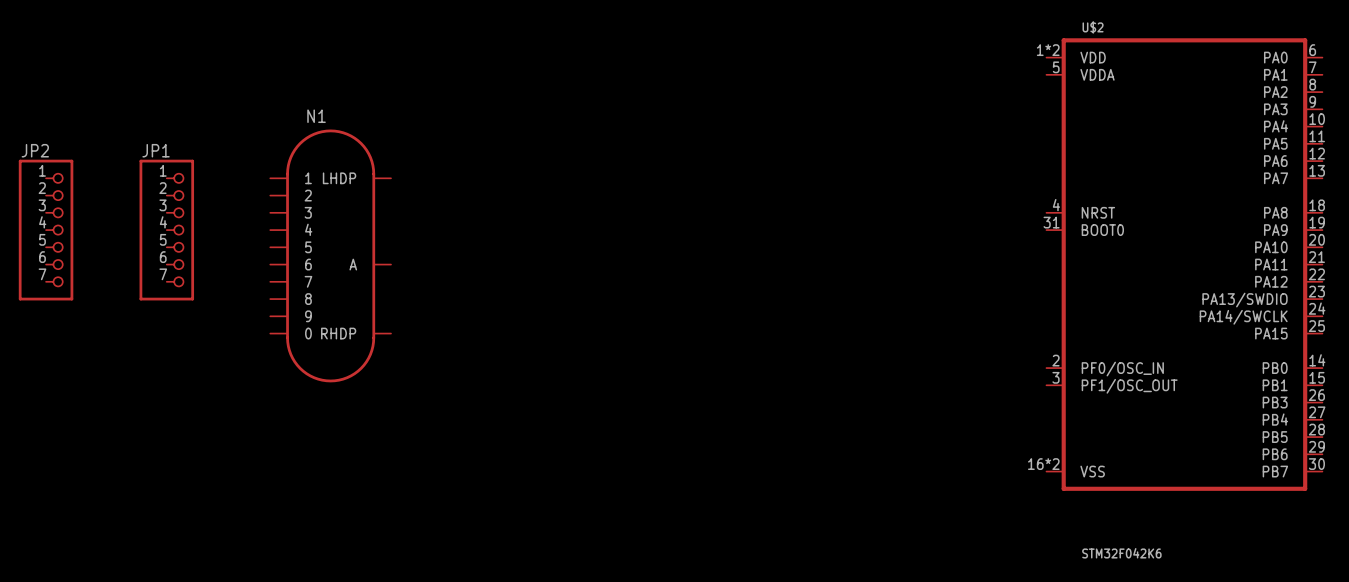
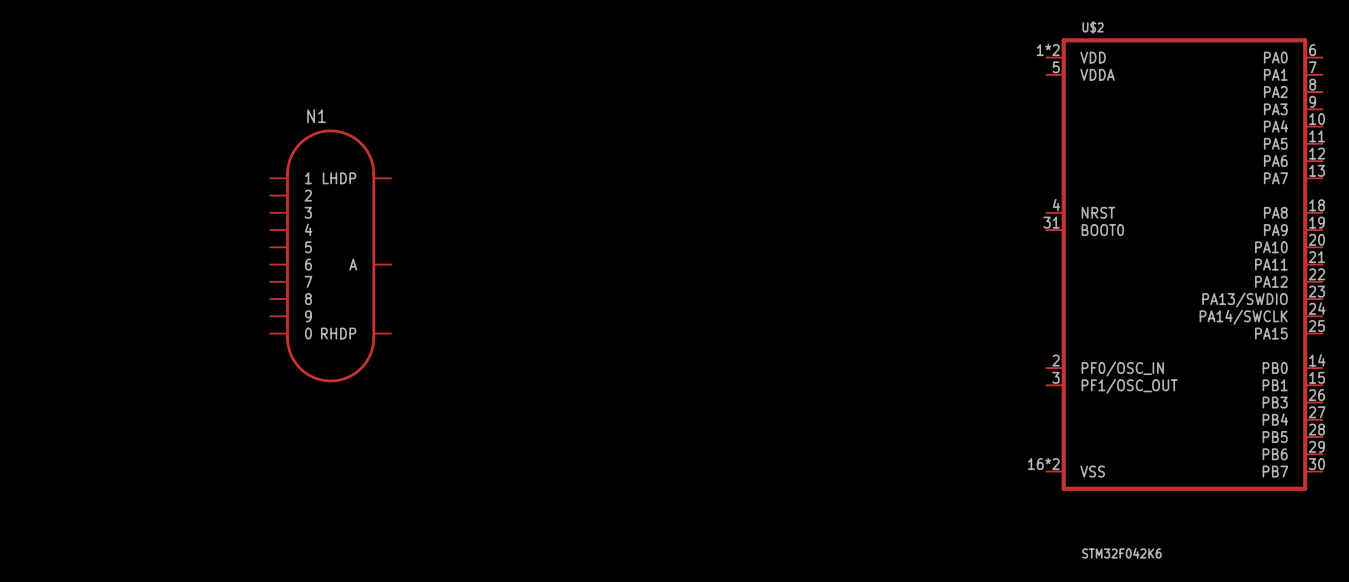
JP2: (46, 230) -> none
JP1: (166, 230) -> none

